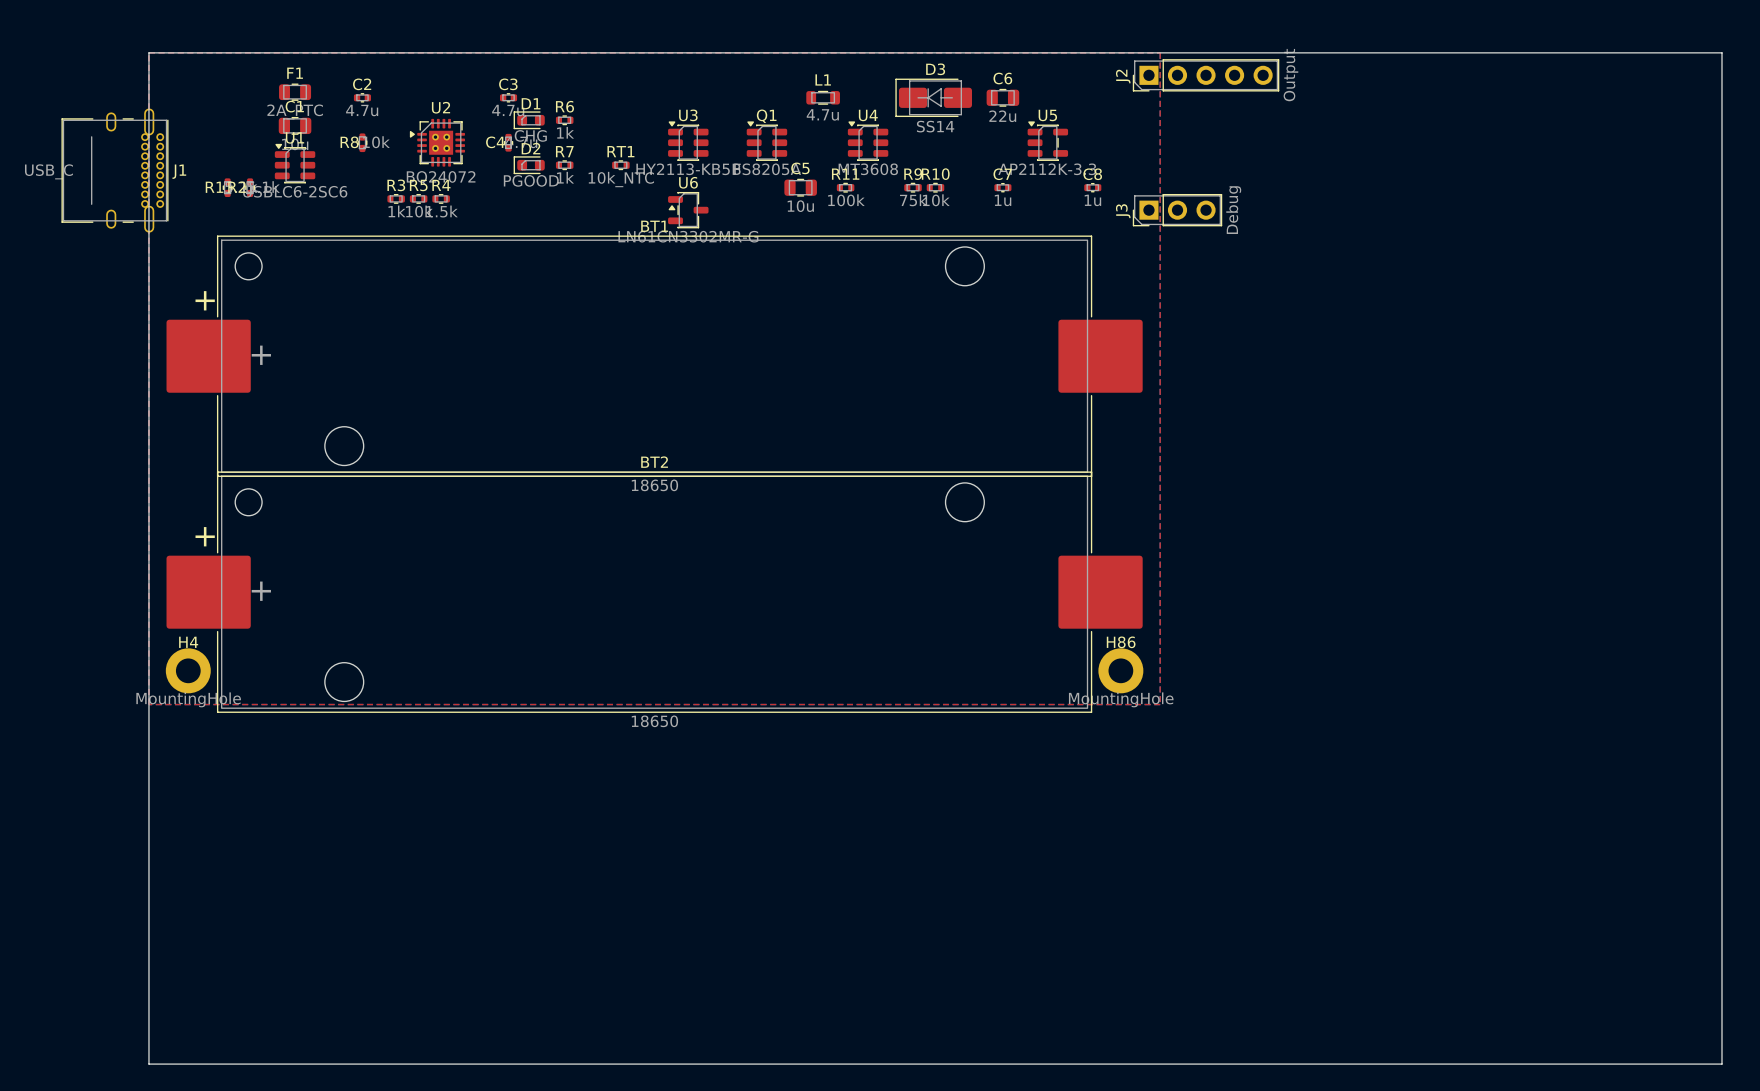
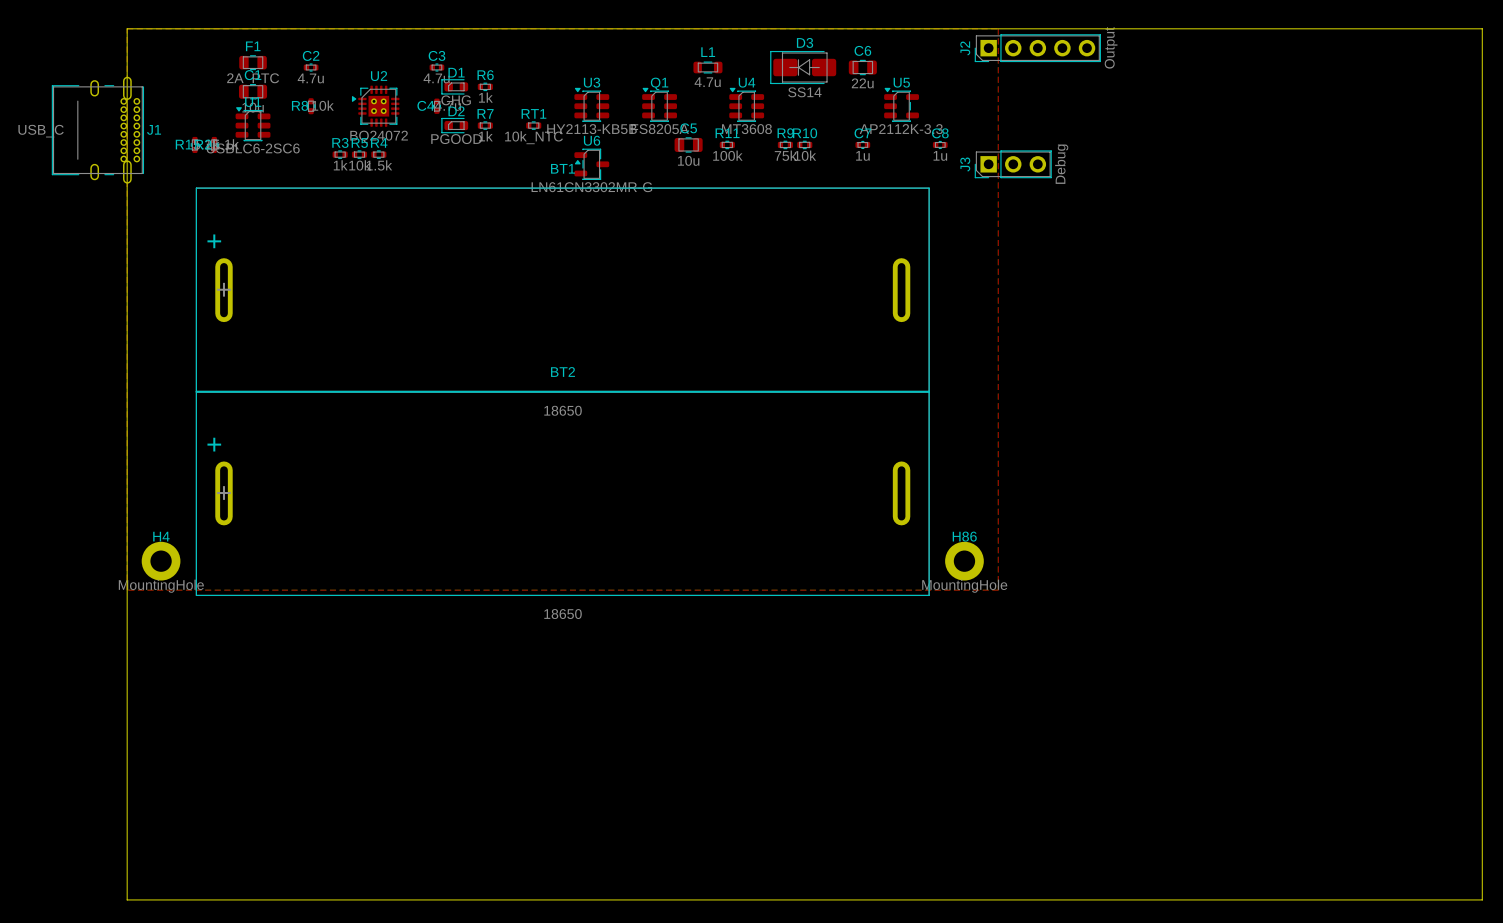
BT1 footprint: [166, 235, 1143, 477] -> [195, 187, 930, 393]
BT2 footprint: [166, 471, 1143, 713] -> [195, 390, 930, 597]

